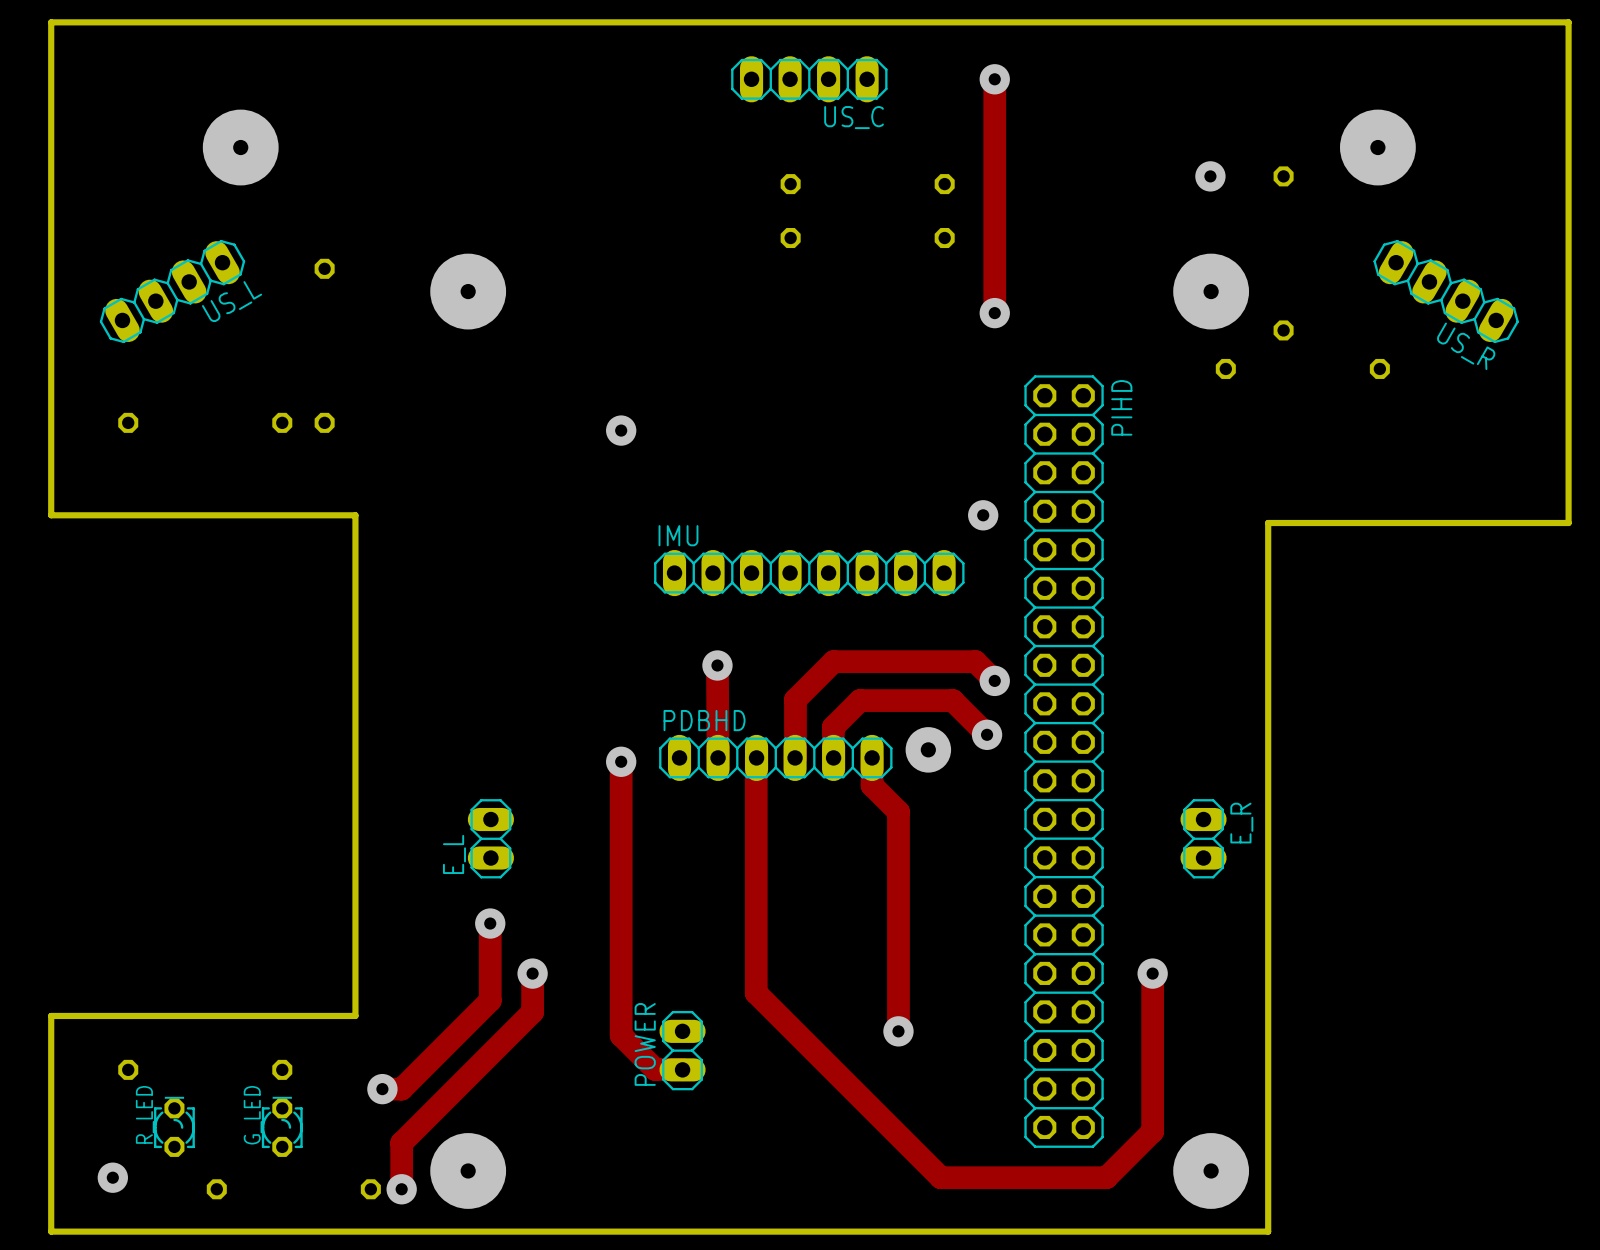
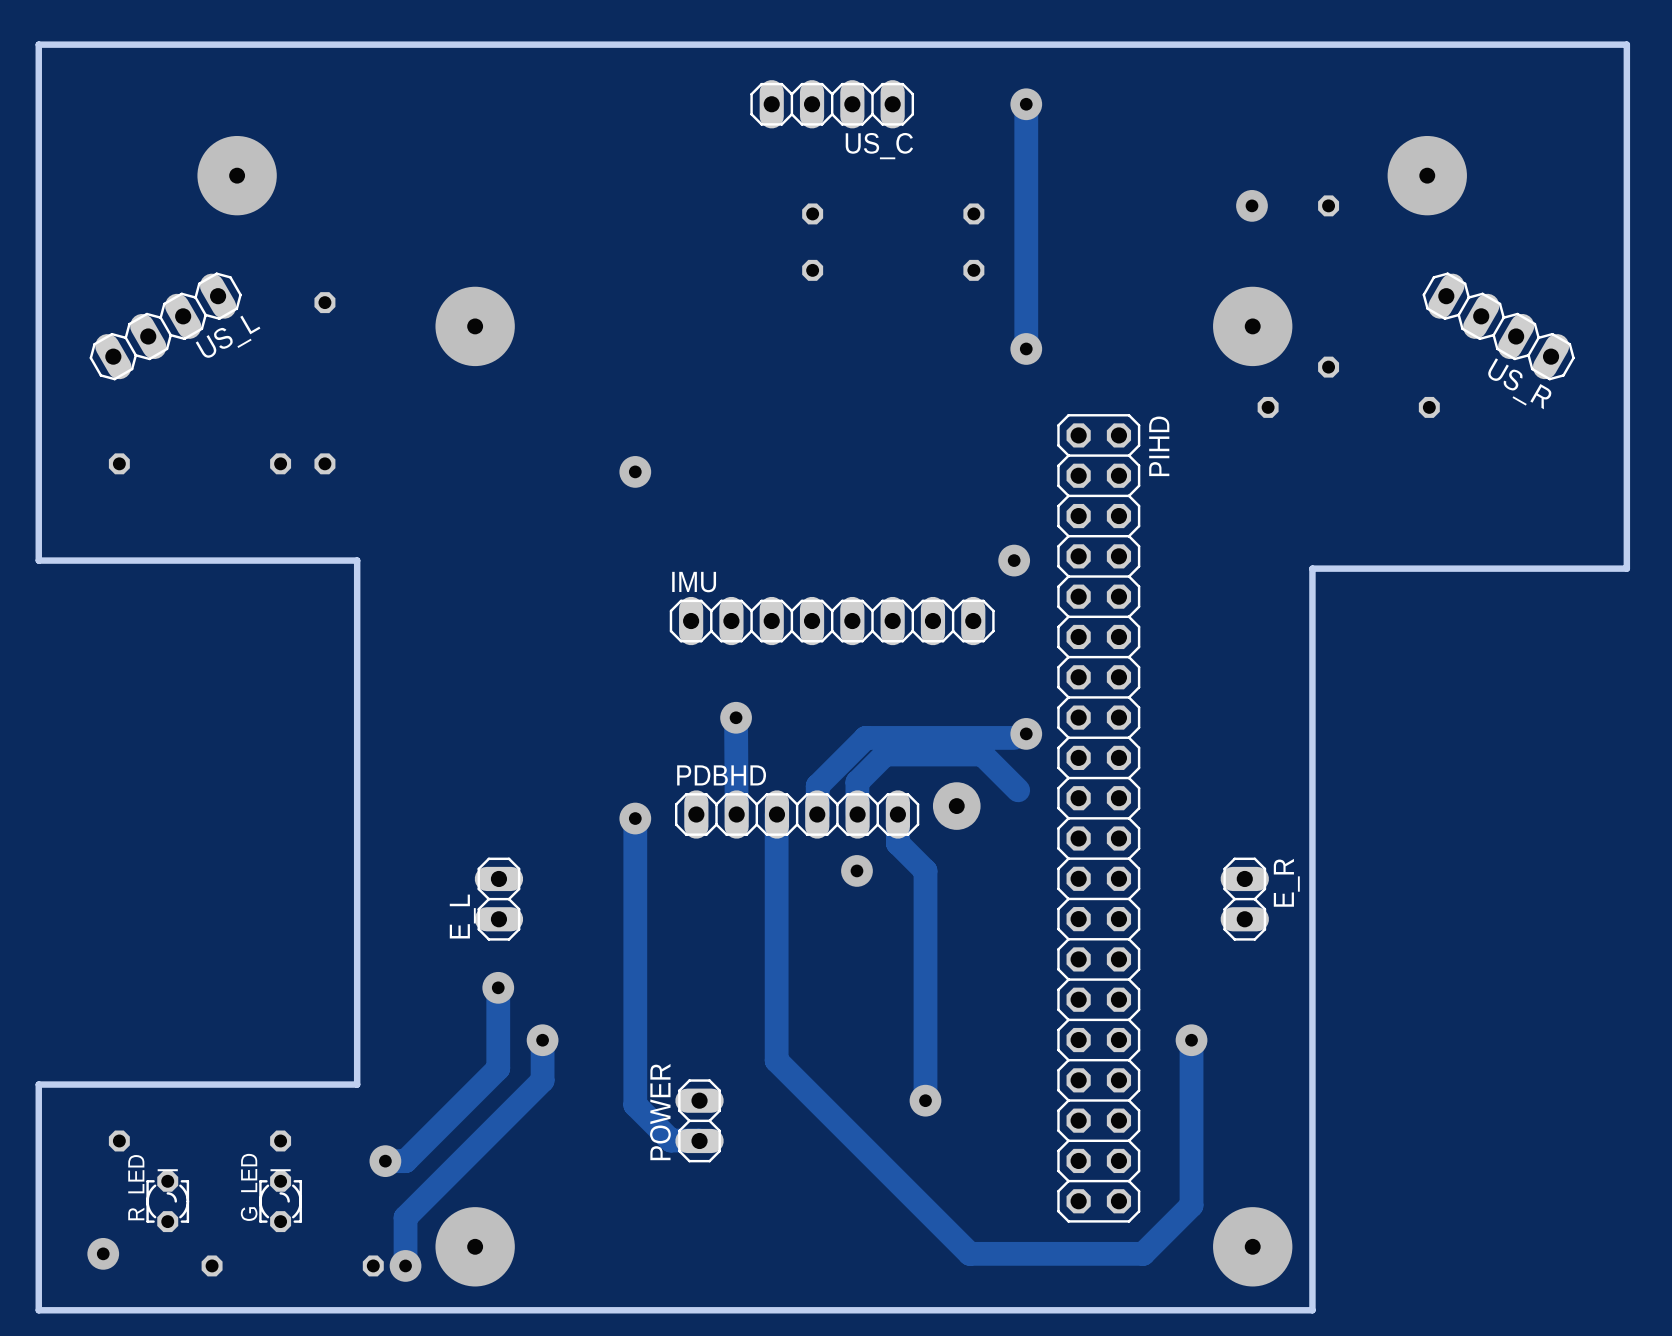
track: (994, 680) (975, 661) (833, 661) (795, 699) (795, 730) -> (1014, 737) (865, 737) (817, 785)
via: (987, 734) -> none
via: none -> (856, 870)

